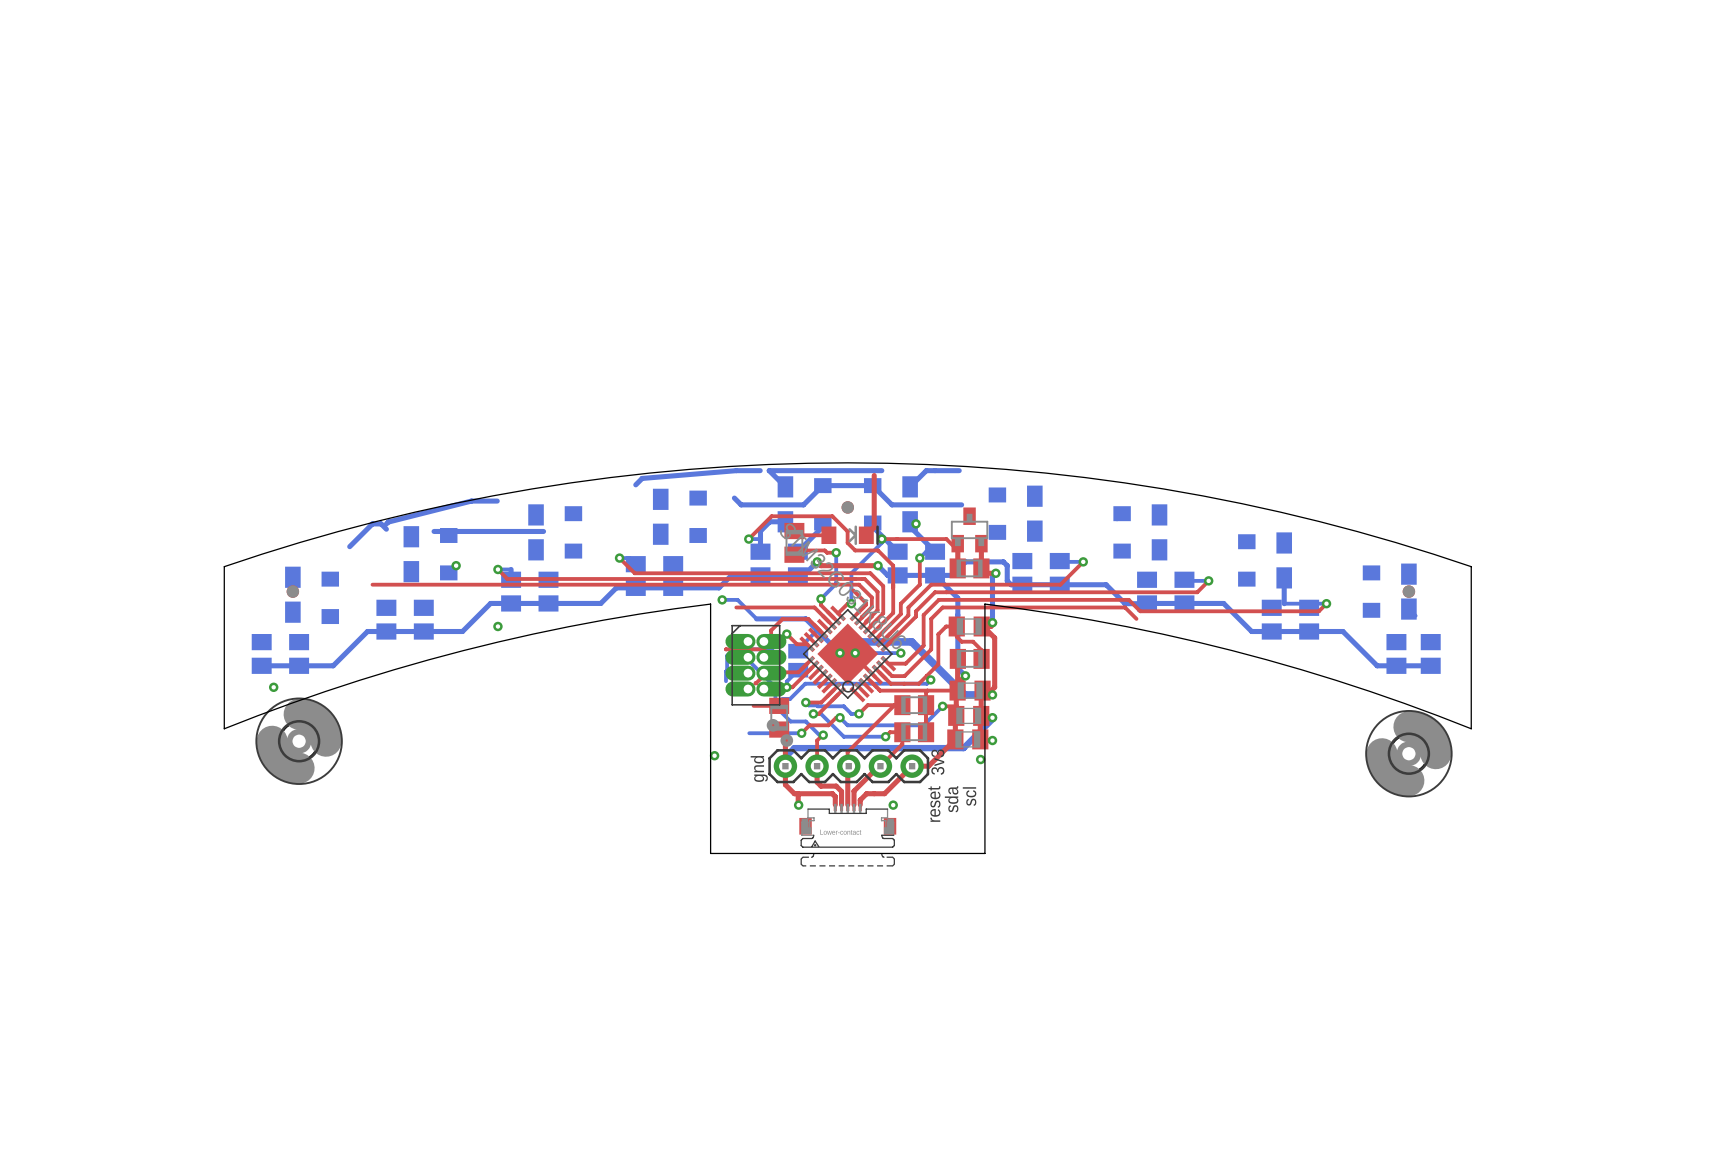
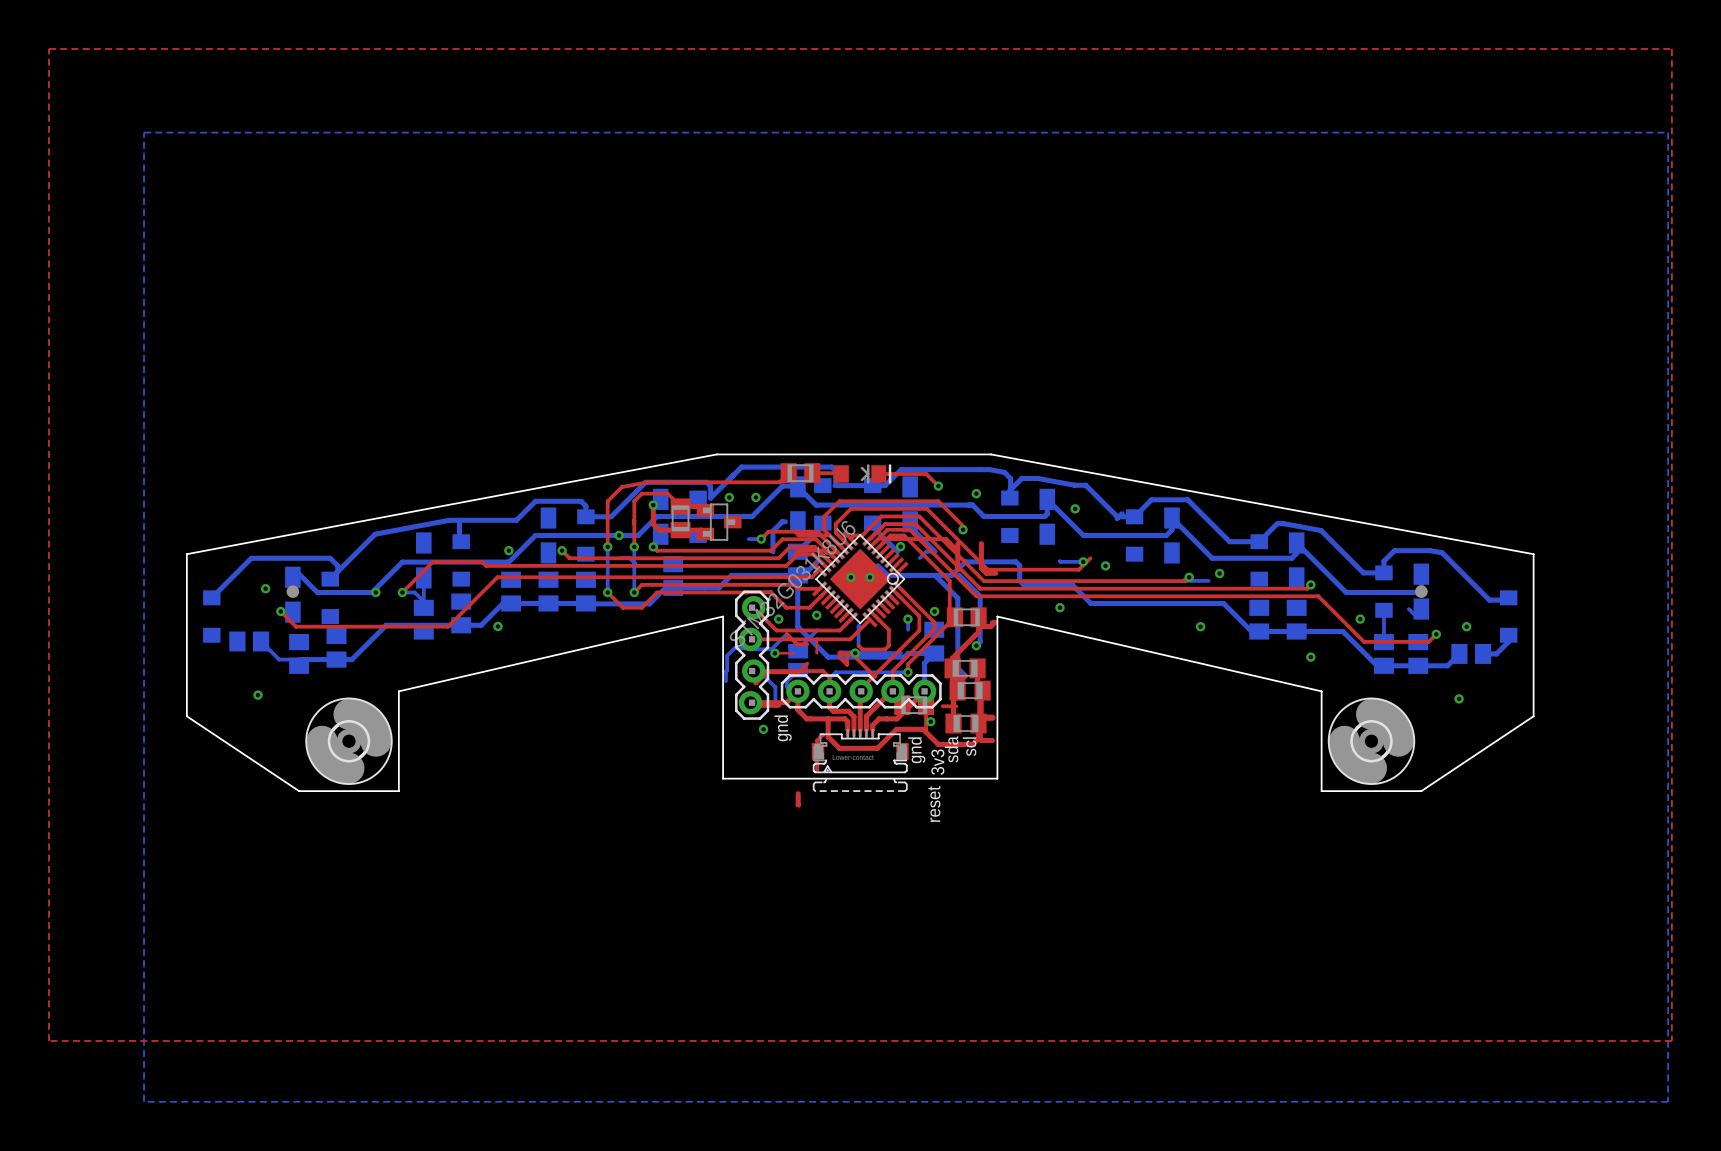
top zone outline: none -> (48, 48) (1671, 48) (1671, 1040) (48, 1040) (48, 48)
bottom zone outline: none -> (144, 132) (1668, 132) (1668, 1101) (144, 1101) (144, 132)
bottom track: (760, 470) (736, 470) (642, 478) (635, 484) -> none
bottom track: (881, 470) (769, 470) (785, 486) -> none
bottom track: (959, 470) (926, 470) (910, 486) -> none
top track: none -> (788, 473) (779, 482) (647, 482) (621, 487) (607, 501) (607, 546)
part: none -> (800, 473)
top track: none -> (812, 473) (841, 473)
top track: none -> (878, 473) (926, 473) (938, 486)
top track: (874, 475) (874, 527) (866, 535) -> none
bottom track: (835, 485) (822, 485) (803, 504) (741, 504) (734, 498) -> (835, 485) (835, 470) (831, 467) (741, 467) (710, 498) (710, 486) (706, 482) (645, 482) (611, 516) (585, 516)
bottom track: (872, 485) (891, 504) (961, 504) -> (872, 485) (885, 485) (901, 469) (989, 469) (1004, 472) (1010, 478) (1010, 497) (1009, 498) (1009, 490) (1021, 478) (1037, 478) (1074, 485) (1085, 485) (1117, 516) (1134, 516)
via: none -> (938, 486)
bottom track: none -> (1047, 492) (1047, 513) (1044, 516) (983, 516) (972, 505) (816, 505) (797, 486) (782, 486) (752, 516) (657, 516) (638, 535) (535, 535) (508, 562) (402, 562) (372, 592) (317, 592) (299, 574)
via: none -> (976, 493)
via: none -> (729, 497)
via: none -> (755, 497)
bottom track: none -> (1047, 499) (1083, 535) (1166, 535) (1171, 529) (1171, 518) (1212, 558) (1291, 558) (1296, 553) (1296, 542) (1346, 592) (1417, 592) (1421, 588) (1421, 574)
bottom track: (497, 501) (471, 501) (386, 523) -> none
part position: (785, 504) -> (797, 504)
top track: none -> (653, 505) (653, 524) (659, 530) (701, 530) (705, 533)
via: none -> (653, 505)
part: (847, 507) -> none
via: none -> (1075, 508)
top track: none -> (705, 510) (701, 506) (680, 506) (667, 493) (641, 493) (634, 501) (634, 546)
part position: (997, 513) -> (1009, 516)
part position: (1034, 513) -> (1047, 516)
bottom track: none -> (585, 516) (585, 506) (581, 501) (535, 501) (516, 520) (449, 520) (375, 534) (336, 572)
part: none -> (680, 518)
bottom track: none -> (459, 520) (459, 539) (461, 541)
bottom track: (782, 521) (769, 521) (760, 531) (760, 551) -> (782, 521) (772, 531) (772, 551)
bottom track: none -> (1129, 521) (1151, 499) (1187, 499) (1229, 541) (1259, 541) (1277, 523) (1321, 530) (1363, 572) (1383, 572) (1383, 561) (1394, 550) (1430, 550) (1442, 552) (1489, 600) (1506, 600) (1508, 597)
via: (916, 523) -> none
bottom track: (386, 529) (381, 523) (372, 523) (349, 546) -> none
top track: none -> (963, 529) (964, 527) (938, 501) (839, 501) (824, 516) (824, 530) (841, 547)
via: none -> (963, 529)
part rotation: 0° (969, 529) -> 90° clockwise (719, 522)
part position: (969, 529) -> (719, 522)
bottom track: (434, 531) (543, 531) -> none
part position: (536, 532) -> (548, 535)
part position: (573, 532) -> (585, 535)
part position: (1122, 532) -> (1134, 535)
part position: (1159, 532) -> (1171, 535)
via: none -> (619, 535)
part position: (850, 535) -> (862, 473)
top track: none -> (850, 538) (853, 535) (862, 535) (881, 516) (919, 516) (983, 581) (1185, 581) (1189, 577)
top track: none -> (869, 538) (885, 524) (915, 524) (980, 588) (1307, 588) (1310, 584)
top track: (748, 539) (771, 516) (832, 516) (847, 531) (847, 542) (855, 550) (878, 550) (893, 565) (893, 612) (875, 631) -> none
via position: (748, 539) -> (761, 539)
top track: none -> (761, 539) (768, 531) (817, 531) (837, 551)
bottom track: (881, 539) (881, 542) (851, 573) (851, 603) -> none
via: (881, 539) -> none
part: (794, 542) -> none
top track: none -> (846, 542) (835, 532) (835, 524) (850, 508) (926, 508) (987, 569) (1078, 569) (1090, 558)
top track: none -> (874, 542) (887, 529) (909, 529) (976, 596) (1318, 596) (1364, 641) (1428, 641) (1436, 634)
bottom track: none -> (607, 546) (607, 592)
via: none -> (607, 546)
bottom track: none -> (634, 546) (634, 592)
via: none -> (634, 546)
top track: none -> (653, 546) (657, 550) (771, 550) (782, 539) (815, 539) (832, 556)
via: none -> (653, 546)
via: none -> (900, 546)
top track: none -> (878, 547) (890, 535) (904, 535) (949, 581) (949, 612) (954, 617) (907, 664) (907, 672)
top track: none -> (562, 550) (569, 558) (778, 558) (790, 546) (814, 546) (828, 560)
via: none -> (562, 550)
bottom track: (836, 552) (836, 583) (821, 598) -> none
via: (836, 552) -> none
part position: (411, 554) -> (423, 560)
part position: (448, 554) -> (461, 560)
top track: (619, 558) (634, 573) (870, 573) (883, 586) (883, 613) (870, 626) -> none
via: (619, 558) -> none
top track: (919, 558) (919, 584) (900, 603) (900, 614) (879, 635) -> none
via: (919, 558) -> none
part position: (1246, 560) -> (1259, 560)
part position: (1284, 560) -> (1296, 560)
top track: (817, 561) (821, 565) (878, 565) -> none
via: (817, 561) -> none
bottom track: (1003, 561) (1007, 565) (1007, 580) (1011, 584) (1023, 584) -> (1003, 561) (1015, 561) (1019, 565) (1019, 580) (1023, 584)
top track: (1083, 561) (1060, 584) (931, 584) (908, 607) (908, 615) (883, 639) -> none
part: (760, 563) -> none
part: (897, 563) -> none
part: (935, 563) -> none
via: (456, 565) -> none
top track: none -> (824, 565) (813, 554) (797, 554) (786, 565) (486, 565) (482, 562) (432, 562) (402, 592)
via position: (878, 565) -> (869, 577)
via: none -> (1105, 565)
board edge: (224, 566) (224, 728) (325, 691) (463, 650) (568, 626) (710, 604) (710, 853) (984, 853) (984, 604) (1091, 620) (1232, 650) (1335, 680) (1471, 728) (1471, 566) (1357, 531) (1280, 512) (1202, 495) (1085, 477) (966, 466) (887, 463) (768, 464) (649, 473) (531, 488) (414, 512) (338, 531) (224, 566) -> (716, 454) (186, 554) (186, 716) (299, 791) (398, 791) (398, 691) (723, 616) (723, 778) (997, 778) (997, 616) (1321, 691) (1321, 791) (1421, 791) (1533, 716) (1533, 554) (991, 454) (716, 454)
part: (969, 568) -> none
top track: (497, 569) (507, 578) (864, 578) (877, 591) (877, 610) (866, 622) -> none
bottom track: (497, 569) (511, 569) (511, 579) -> none
via position: (497, 569) -> (508, 550)
top track: none -> (819, 569) (811, 577) (497, 577) (448, 626) (296, 626) (280, 611)
bottom track: none -> (337, 571) (337, 565) (330, 558) (251, 558) (211, 597)
part: (1022, 572) -> none
part: (1059, 572) -> none
bottom track: (995, 573) (992, 576) (992, 622) -> none
via: (995, 573) -> none
via: none -> (1219, 573)
bottom track: none -> (797, 575) (797, 626) (828, 657) (904, 657) (908, 653) (934, 653) (924, 663) (924, 691)
bottom track: none -> (959, 575) (980, 596) (980, 641) (976, 645)
part position: (635, 576) -> (585, 591)
bottom track: none -> (423, 577) (423, 601) (414, 592) (402, 592)
via: none -> (850, 577)
via: none -> (1189, 577)
bottom track: (1284, 577) (1284, 603) (1326, 603) -> none
top track: (1208, 580) (1197, 592) (935, 592) (916, 611) (916, 616) (888, 644) -> none
via: (1208, 580) -> none
top track: (372, 584) (859, 584) (871, 597) (871, 607) (861, 617) -> none
bottom track: (1072, 584) (1106, 584) (1125, 603) (1147, 603) -> (1072, 584) (1090, 603) (1147, 603)
via: none -> (1310, 584)
bottom track: (665, 587) (616, 587) (600, 603) (585, 603) -> (665, 587) (649, 603) (585, 603)
via: none -> (265, 588)
top track: none -> (819, 588) (797, 588) (793, 584) (641, 584) (634, 592)
top track: none -> (900, 588) (934, 622) (934, 629) (892, 670) (892, 691) (866, 716) (866, 729)
top track: (853, 590) (866, 603) (857, 613) -> none
part: (1147, 591) -> none
part: (1184, 591) -> none
part position: (1371, 591) -> (1383, 591)
part position: (1408, 591) -> (1421, 591)
part position: (1408, 591) -> (1421, 591)
via: none -> (375, 592)
via: none -> (402, 592)
top track: none -> (607, 592) (622, 607) (641, 607) (657, 592) (747, 592) (770, 592) (786, 607) (809, 607) (824, 593)
via: none -> (607, 592)
via: none -> (634, 592)
top track: none -> (896, 593) (919, 616) (919, 630) (860, 689) (860, 692)
top track: (821, 598) (821, 605) (833, 617) -> none
via position: (821, 598) -> (816, 615)
bottom track: (722, 599) (737, 599) (756, 618) (805, 618) (840, 653) (851, 641) (911, 641) (964, 694) (992, 694) -> none
via: (722, 599) -> none
bottom track: (503, 603) (490, 603) (462, 631) (367, 631) (333, 665) (261, 665) -> (503, 603) (481, 625) (386, 625) (351, 659) (279, 659) (261, 641)
top track: (851, 603) (847, 603) (838, 613) -> none
via: (851, 603) -> none
top track: (1326, 603) (1318, 611) (1140, 611) (1128, 599) (938, 599) (923, 615) (923, 645) (905, 663) (888, 663) -> none
via: (1326, 603) -> none
top track: (736, 607) (814, 607) (829, 622) -> none
top track: none -> (753, 607) (776, 630) (839, 630) (850, 619)
via: none -> (1059, 607)
bottom track: none -> (1383, 610) (1383, 642)
via: none -> (280, 611)
via: none -> (934, 611)
part: none -> (461, 613)
top track: none -> (874, 615) (888, 629) (888, 645) (885, 649) (862, 649) (858, 645)
part: none -> (211, 616)
part footprint: [948, 616, 990, 637] -> [946, 607, 987, 628]
part: none -> (1508, 616)
top track: none -> (978, 617) (978, 632) (952, 658) (952, 695) (954, 698) (953, 723)
top track: (1136, 618) (1125, 607) (942, 607) (931, 618) (931, 649) (904, 676) (891, 676) (883, 668) -> none
part: (386, 619) -> none
via: none -> (778, 619)
top track: none -> (869, 619) (850, 639) (750, 639)
via: none -> (907, 619)
bottom track: none -> (908, 619) (908, 629)
part: none -> (1259, 619)
part: (1271, 619) -> none
part: none -> (1296, 619)
part: (1309, 619) -> none
via: none -> (1360, 619)
via: (992, 622) -> none
part footprint: [725, 624, 787, 706] -> [735, 590, 770, 720]
bottom track: none -> (859, 625) (858, 645)
top track: (983, 626) (994, 637) (994, 687) (990, 691) (981, 691) -> none
via: none -> (1200, 626)
via: none -> (1466, 626)
top track: (820, 631) (808, 619) (782, 619) (771, 630) (771, 642) (763, 649) (725, 649) -> none
via: (786, 634) -> none
via: none -> (1436, 634)
bottom track: none -> (1508, 635) (1508, 641) (1496, 653) (1483, 653)
top track: none -> (816, 639) (817, 653)
via: none -> (976, 645)
part: none -> (336, 647)
part footprint: [949, 648, 990, 669] -> [944, 658, 986, 679]
part rotation: 0° (261, 653) -> 90° clockwise (249, 641)
top track: none -> (774, 653) (793, 653)
via: none -> (774, 653)
via: (840, 653) -> none
part rotation: 0° (847, 653) -> 90° counterclockwise (860, 579)
part position: (847, 653) -> (860, 579)
via: (900, 653) -> none
part: none -> (1383, 653)
part: (1396, 653) -> none
part: none -> (1418, 653)
part: (1430, 653) -> none
bottom track: none -> (1459, 653) (1447, 665) (1430, 665)
part: none -> (1471, 653)
via: none -> (1310, 657)
top track: (981, 658) (981, 650) (973, 641) (961, 641) (956, 636) (956, 626) (946, 626) (938, 634) (938, 664) (918, 683) (890, 683) (879, 672) -> none
top track: (811, 668) (792, 687) (786, 687) -> none
top track: none -> (977, 668) (979, 722) (978, 738) (972, 744) (938, 744) (923, 729) (896, 729) (877, 748) (839, 748) (828, 736) (828, 718)
top track: none -> (753, 671) (823, 671) (829, 677) (829, 707) (833, 711) (848, 711) (854, 716) (854, 729)
bottom track: none -> (907, 672) (835, 672) (829, 678) (829, 691)
via: none -> (907, 672)
via: (965, 675) -> none
bottom track: (930, 679) (926, 683) (805, 683) (790, 698) (782, 698) (775, 706) (790, 721) (805, 721) (821, 737) (823, 735) -> none
via: (930, 679) -> none
top track: (870, 681) (880, 690) (957, 690) (955, 739) (928, 766) (912, 766) -> none
via position: (273, 687) -> (258, 695)
via: (786, 687) -> none
top track: none -> (927, 688) (897, 718) (879, 718) (872, 725) (872, 729)
top track: (833, 690) (821, 702) (805, 702) -> none
top track: none -> (860, 692) (860, 729)
top track: (838, 694) (818, 713) (813, 713) -> none
via: (992, 694) -> none
via: none -> (1459, 698)
top track: none -> (750, 702) (786, 702) (797, 691) (797, 709) (806, 718) (844, 718) (847, 721) (847, 729)
bottom track: (805, 702) (808, 705) (843, 706) (851, 713) (859, 713) -> none
via: (805, 702) -> none
top track: (894, 705) (847, 752) (847, 767) -> none
top track: (902, 705) (867, 705) (859, 713) -> none
bottom track: (942, 706) (923, 725) (847, 725) (840, 717) -> none
via position: (942, 706) -> (930, 721)
bottom track: (813, 713) (821, 713) (843, 736) (885, 736) -> none
via: (813, 713) -> none
via: (859, 713) -> none
part: (968, 715) -> none
part: (779, 717) -> none
top track: (840, 717) (836, 717) (828, 725) (809, 725) (801, 733) -> none
via: (840, 717) -> none
bottom track: (992, 717) (994, 717) (963, 748) (794, 748) (785, 757) (785, 766) -> none
via: (992, 717) -> none
drawing: [766, 718, 794, 747] -> none
part: none -> (966, 723)
via: none -> (763, 729)
top track: (779, 729) (785, 735) (785, 784) (794, 793) (832, 793) (835, 796) (835, 804) -> none
part side: top (914, 732) -> bottom (934, 641)
bottom track: (749, 733) (801, 733) -> none
via: (801, 733) -> none
via: (823, 735) -> none
top track: (885, 736) (890, 732) (902, 732) (902, 744) (880, 766) -> none
via: (885, 736) -> none
part: (967, 739) -> none
via: (992, 740) -> none
part position: (299, 741) -> (348, 741)
text: none -> gnd (916, 750)
part position: (1408, 753) -> (1371, 741)
via: (714, 755) -> none
via: (980, 759) -> none
top track: (847, 765) (847, 804) -> none
top track: (817, 766) (817, 782) (821, 786) (836, 786) (841, 791) (841, 804) -> none
part position: (848, 766) -> (861, 691)
top track: (880, 766) (854, 791) (854, 804) -> none
top track: (912, 766) (884, 793) (866, 793) (860, 800) (860, 804) -> none
text position: gnd (759, 768) -> gnd (783, 728)
text position: scl (969, 796) -> scl (969, 746)
text position: sda (951, 799) -> sda (951, 749)
via: (798, 805) -> none
via: (893, 805) -> none
part position: (847, 832) -> (860, 757)

